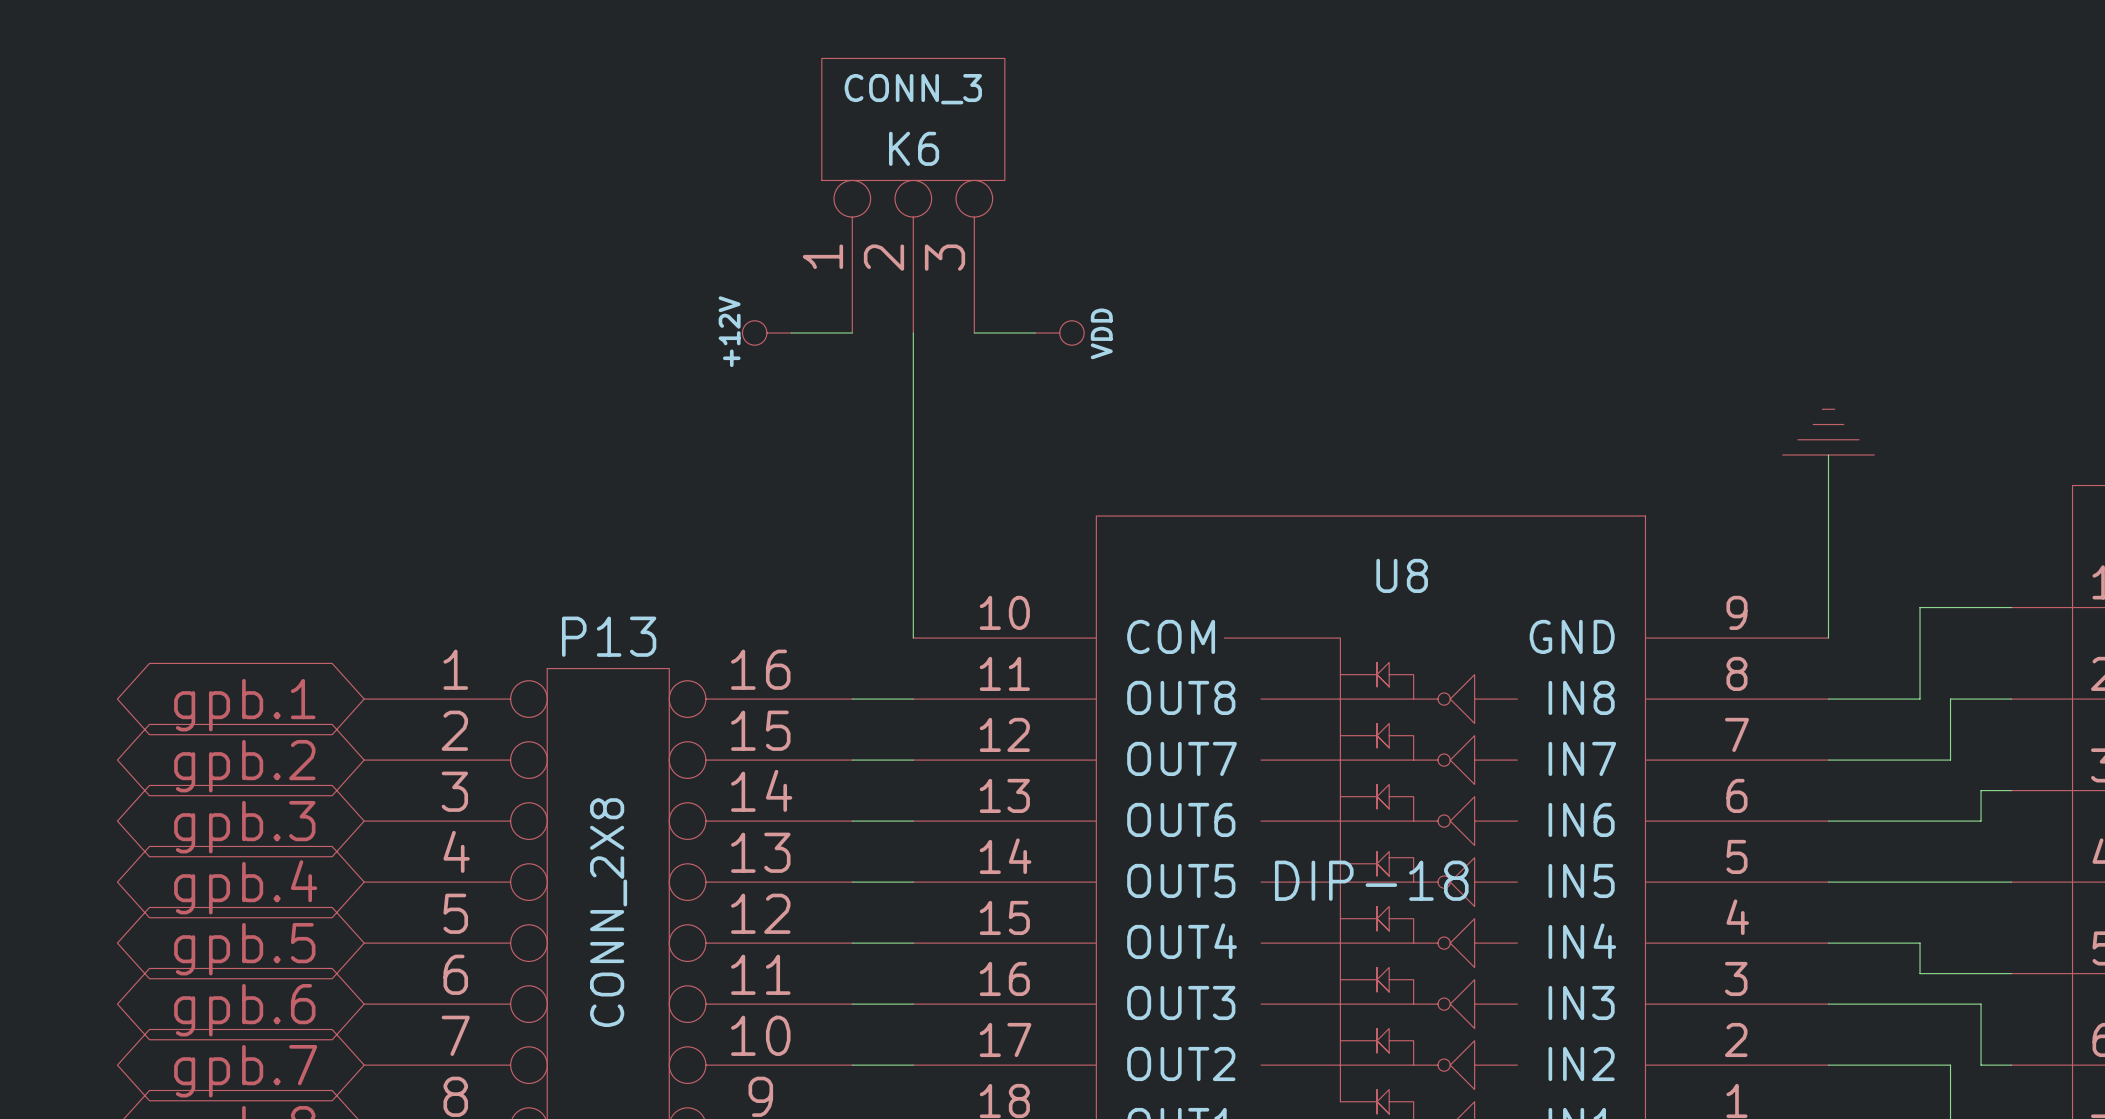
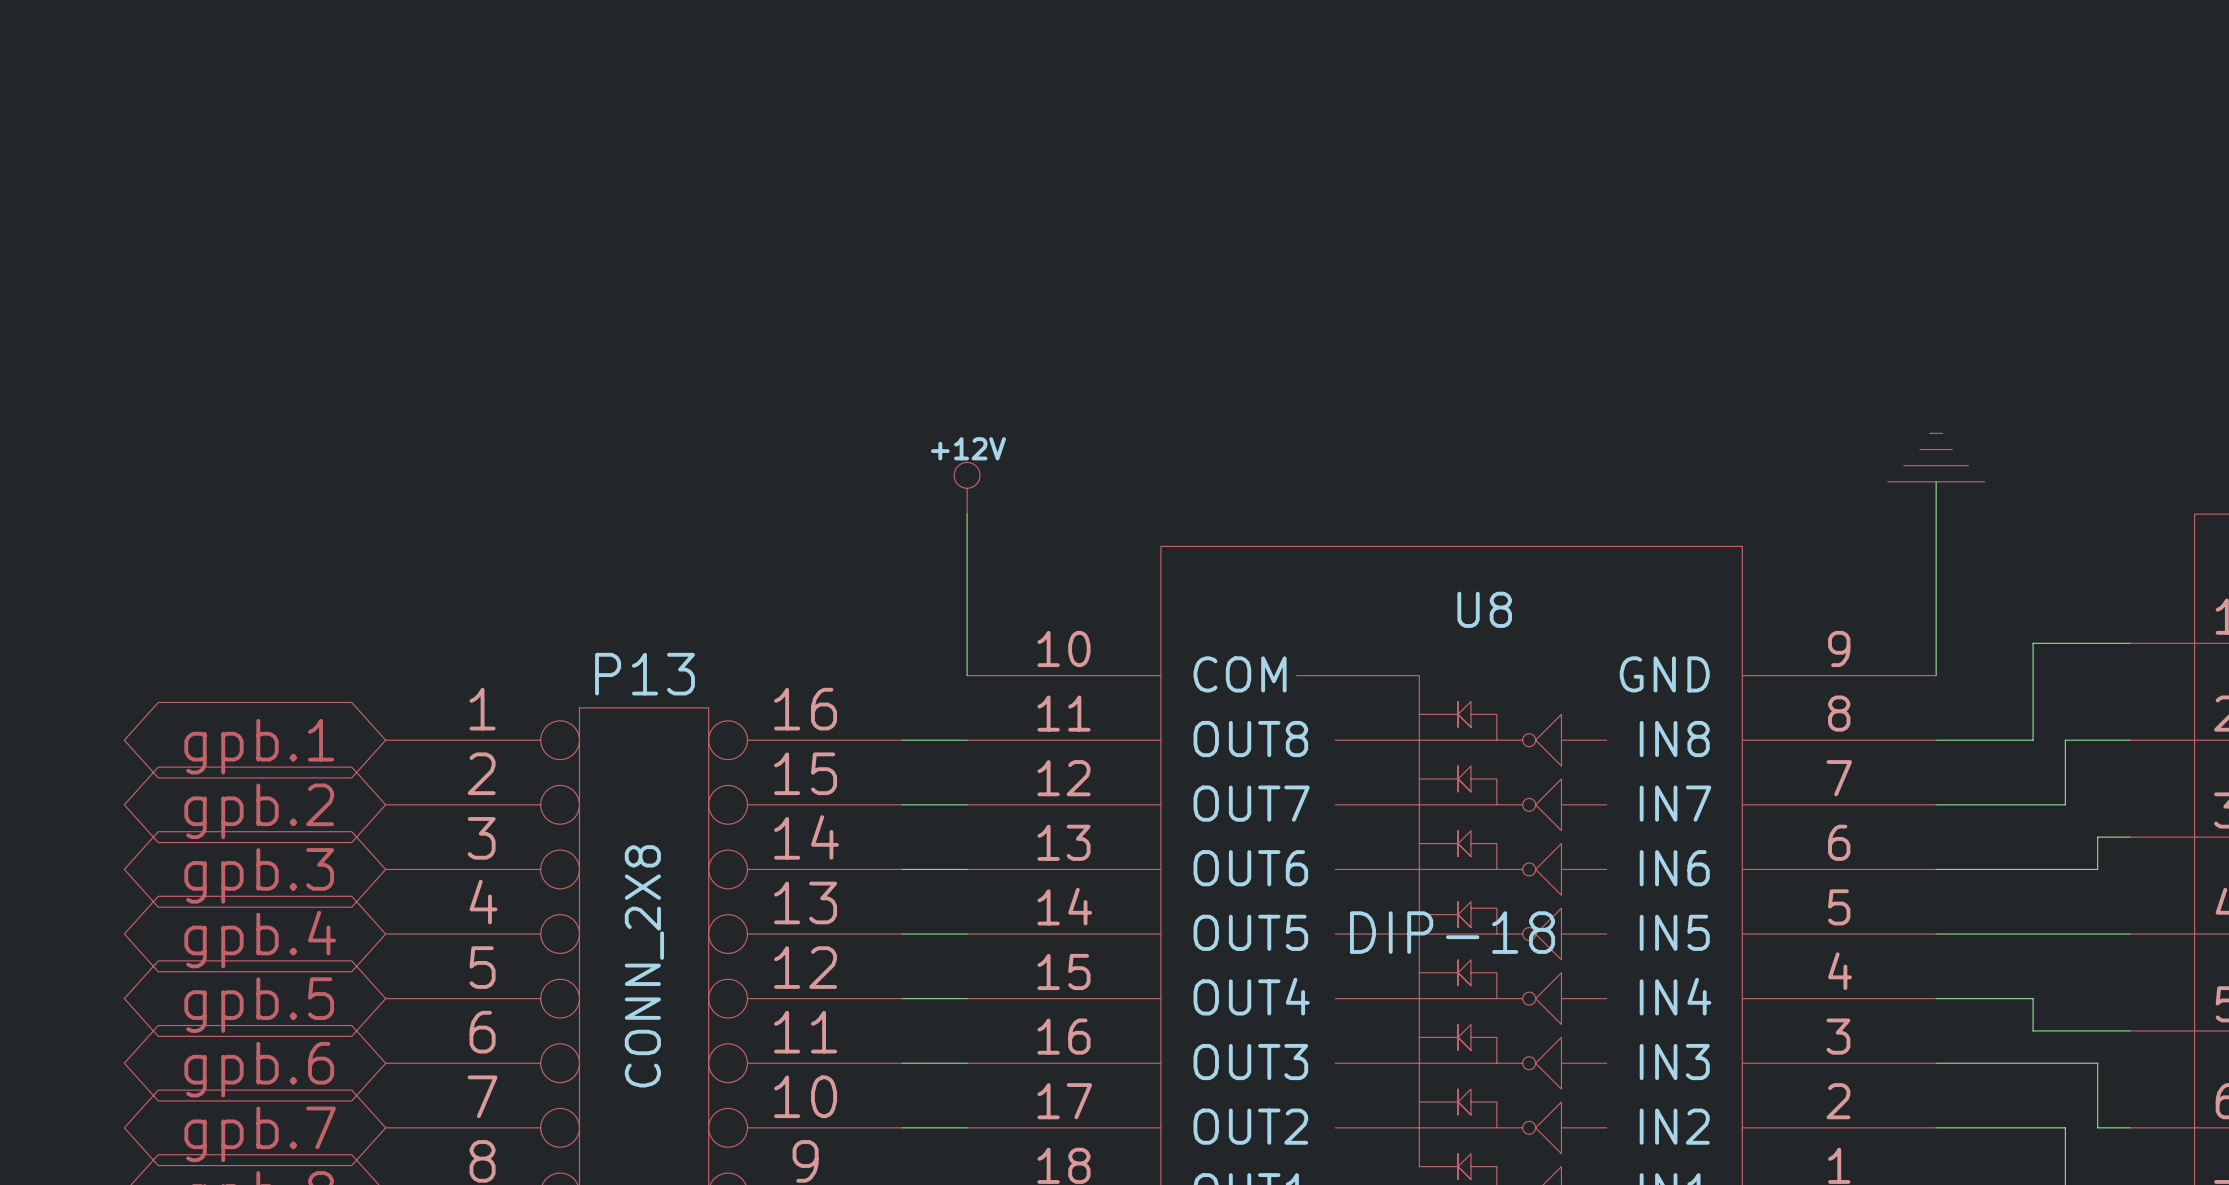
K6: CONN_3 (913, 195) -> none
power symbol rotation: 0° (766, 332) -> 90° clockwise (967, 488)
power symbol position: +12V (766, 332) -> +12V (967, 488)
wire: (791, 332) (852, 332) -> none
wire: (913, 332) (913, 485) -> none
wire: (974, 332) (1035, 332) -> none
power symbol: VDD (1059, 332) -> none

